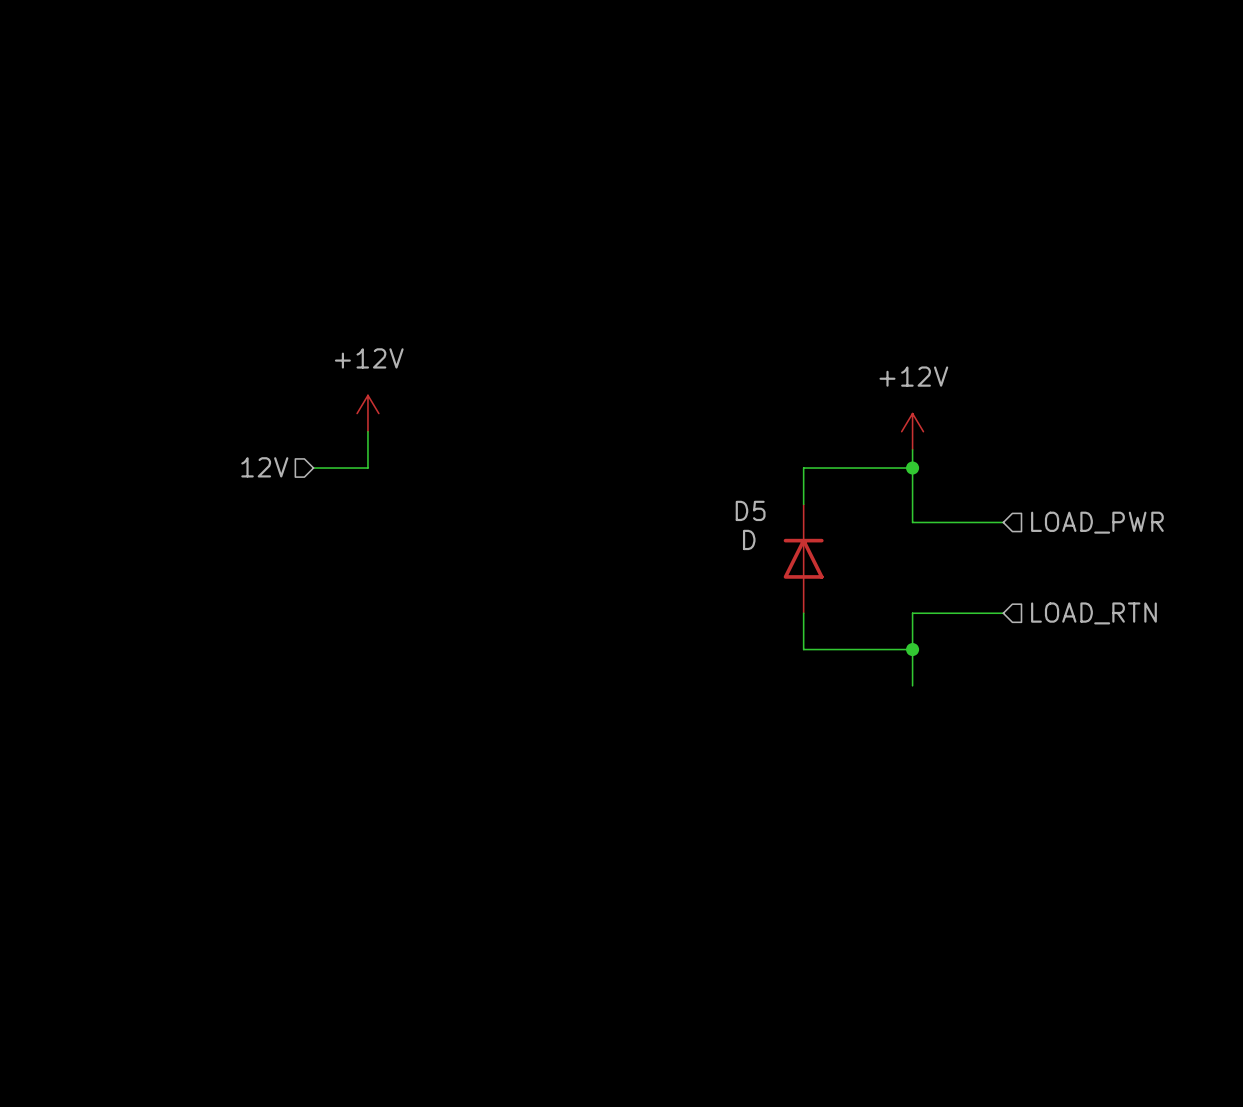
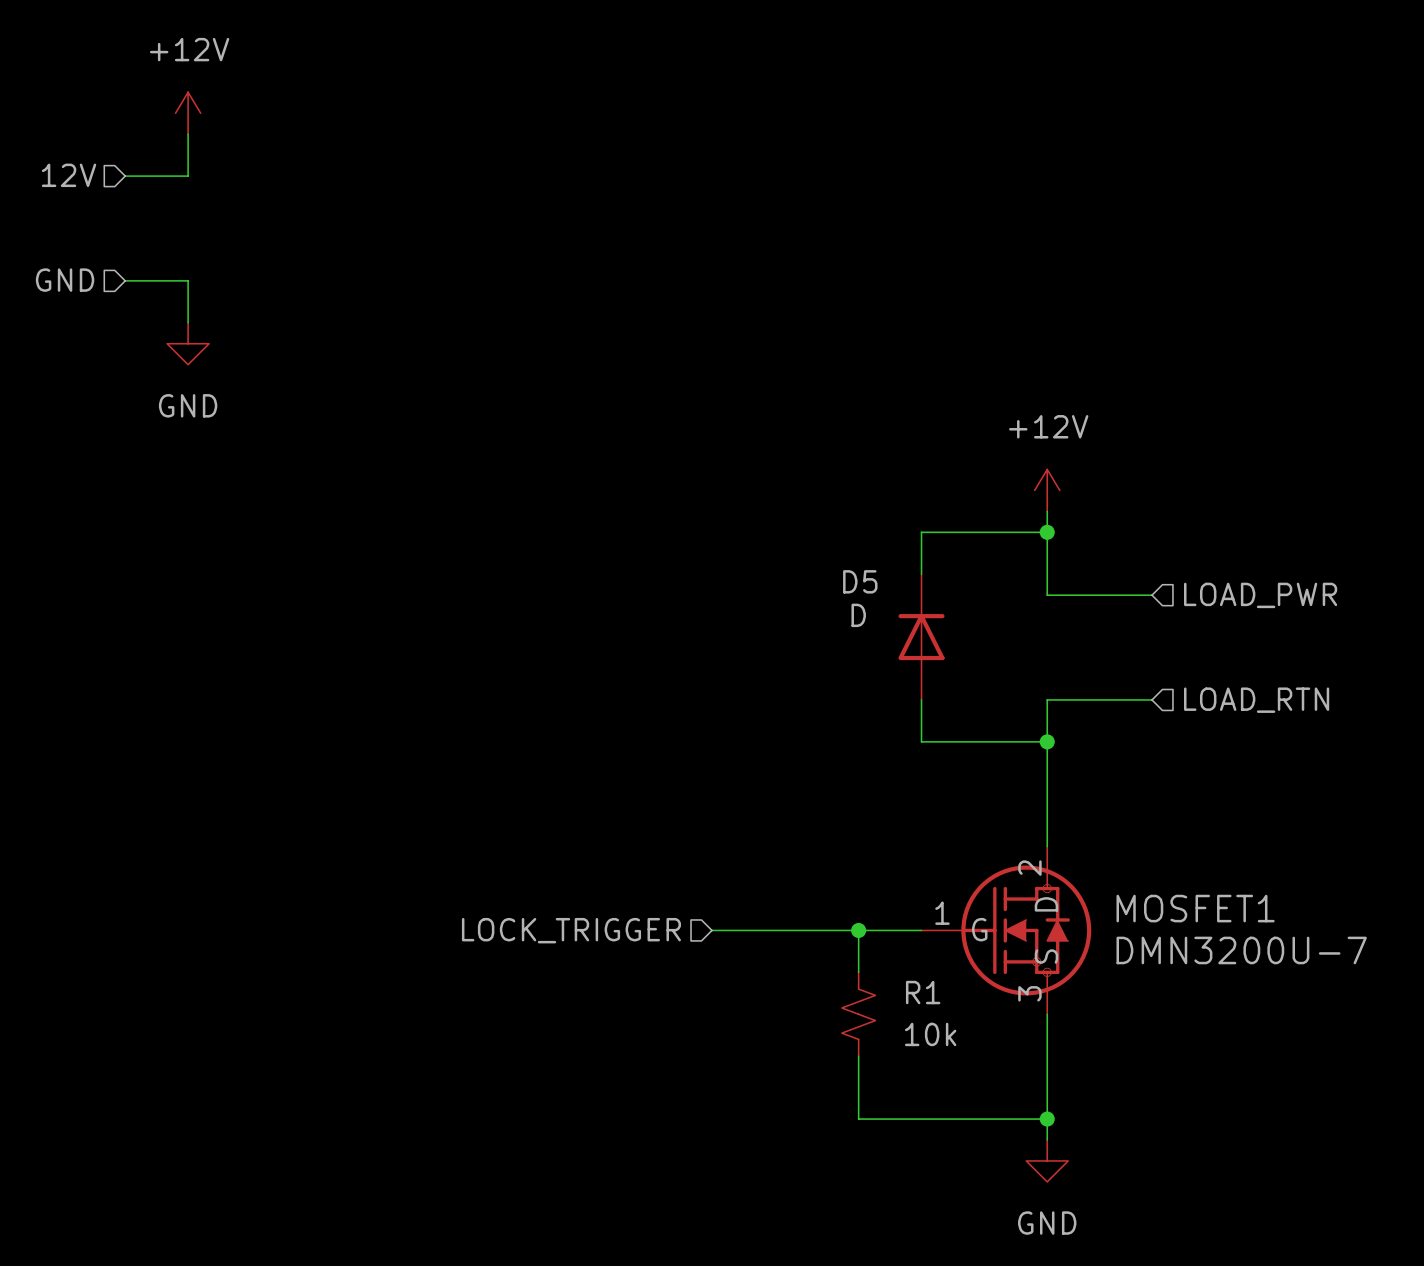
power symbol: none -> +12V (188, 113)
wire: none -> (188, 134) (188, 176) (125, 176)
hierarchical label: none -> 12V (69, 175)
hierarchical label: none -> GND (65, 280)
wire: none -> (125, 280) (188, 280) (188, 322)
power symbol: none -> GND (188, 343)
power symbol: +12V (367, 413) -> none
wire: (367, 431) (367, 468) (313, 468) -> none
hierarchical label: 12V (264, 467) -> none
wire: none -> (1047, 783) (1047, 846)
wire: none -> (711, 930) (921, 930)
wire: none -> (858, 930) (858, 972)
junction: none -> (858, 930)
MOSFET1: none -> DMN3200U-7 (1006, 930)
hierarchical label: none -> LOCK_TRIGGER (571, 930)
R1: none -> 10k (858, 1014)
wire: none -> (1047, 1014) (1047, 1140)
wire: none -> (858, 1056) (858, 1119) (1047, 1119)
junction: none -> (1047, 1119)
power symbol: none -> GND (1047, 1160)

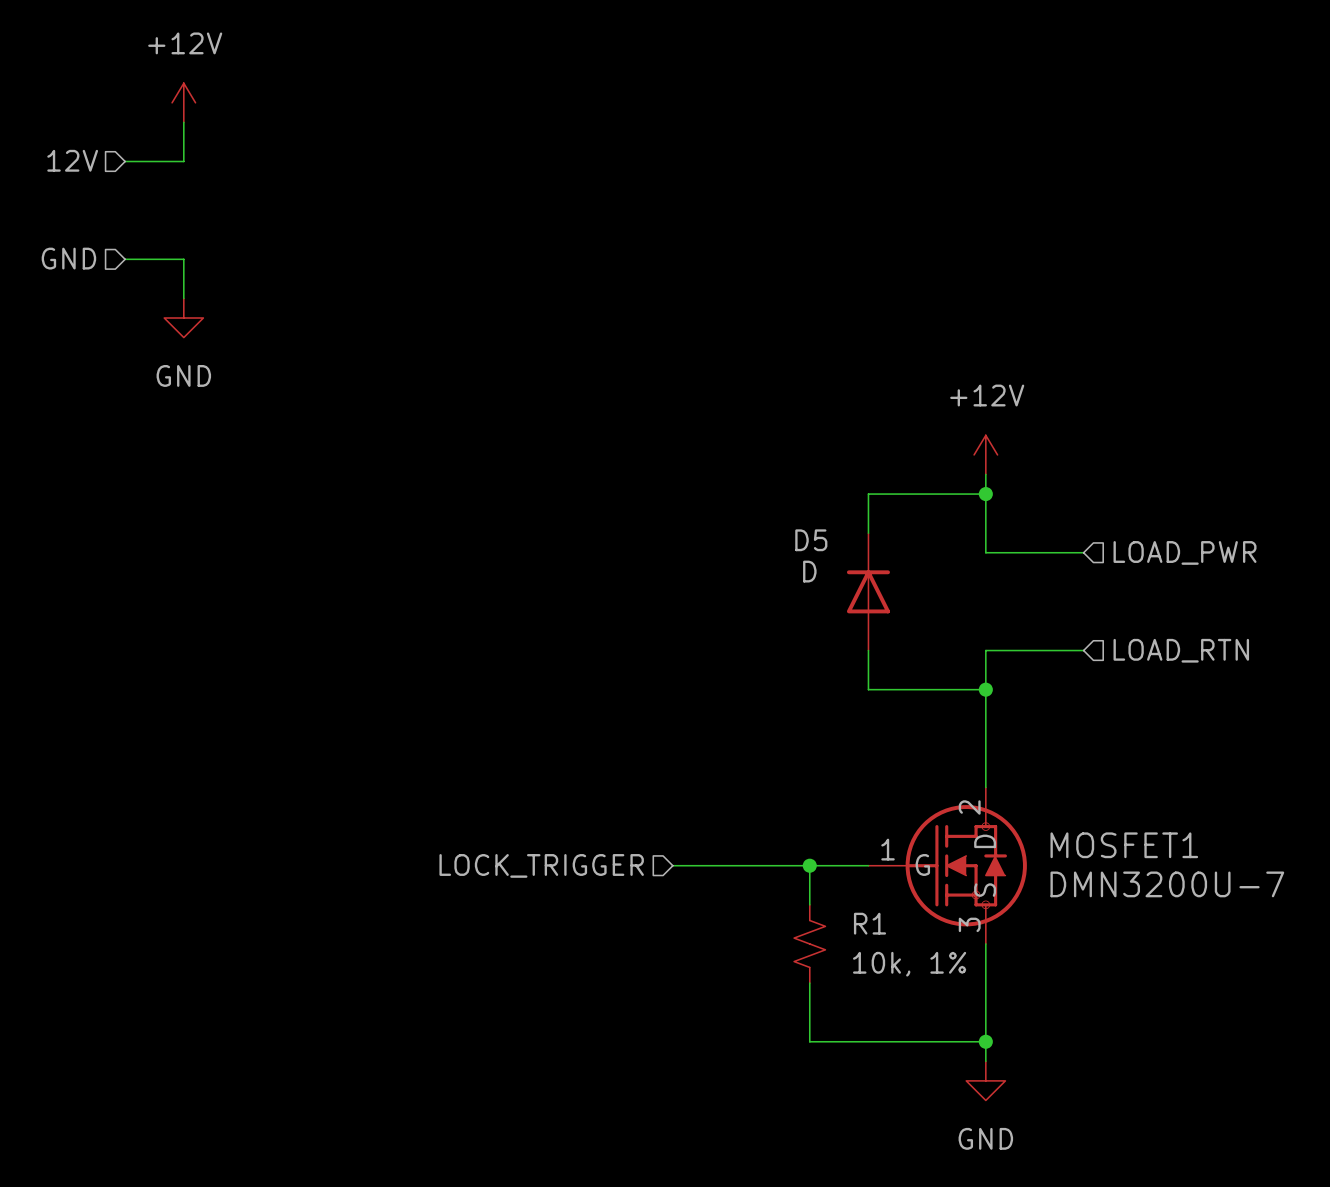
R1 value: 10k (930, 1034) -> 10k, 1% (909, 964)

